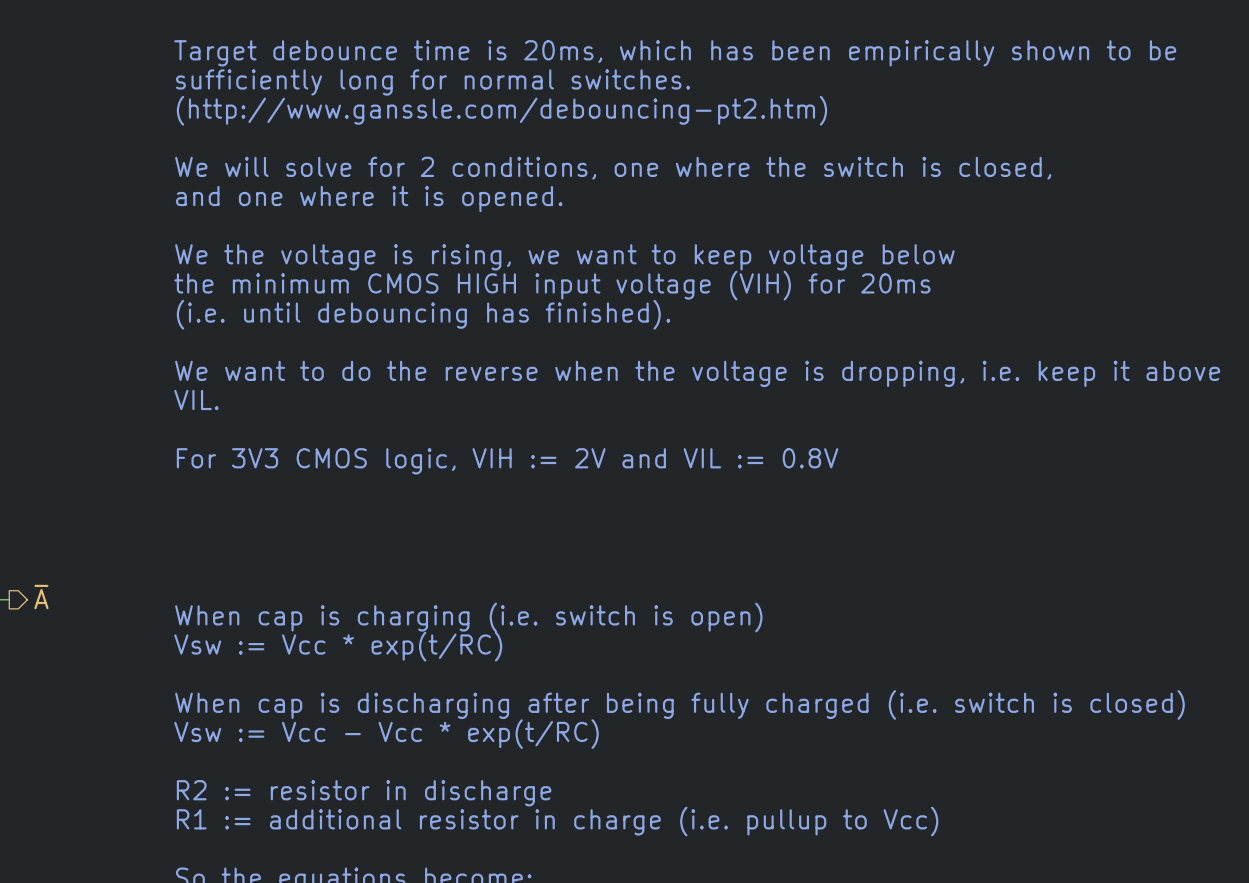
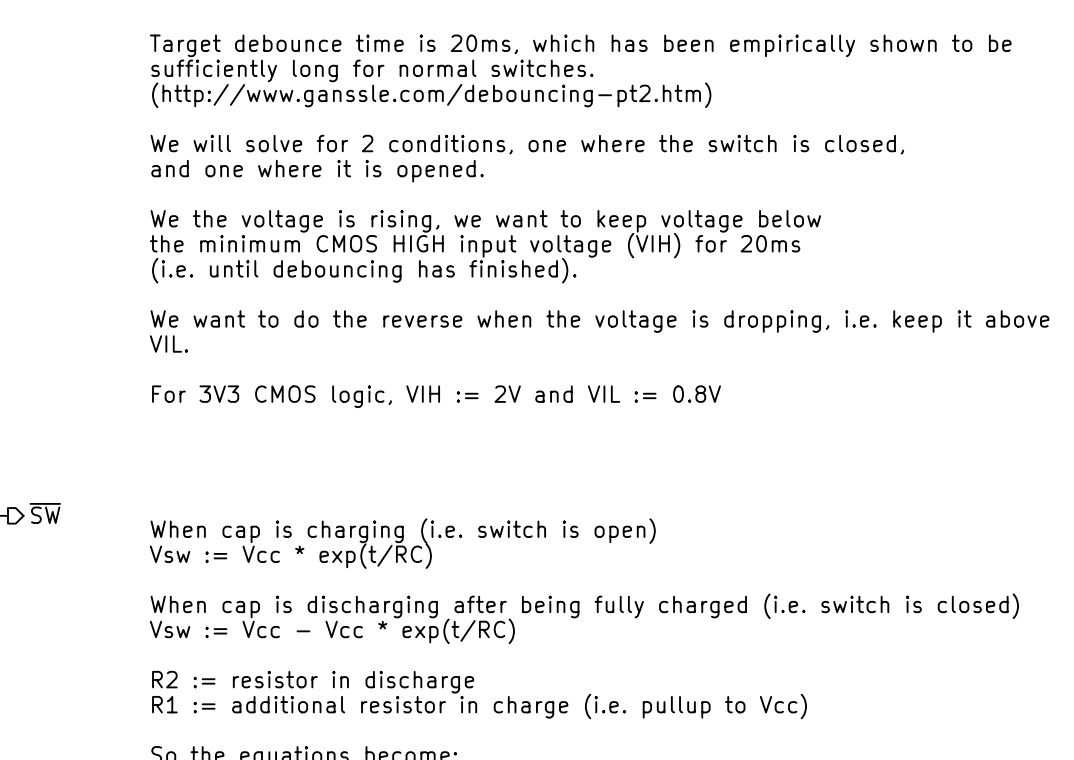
hierarchical label: ~{A} (41, 597) -> ~{SW} (45, 513)

